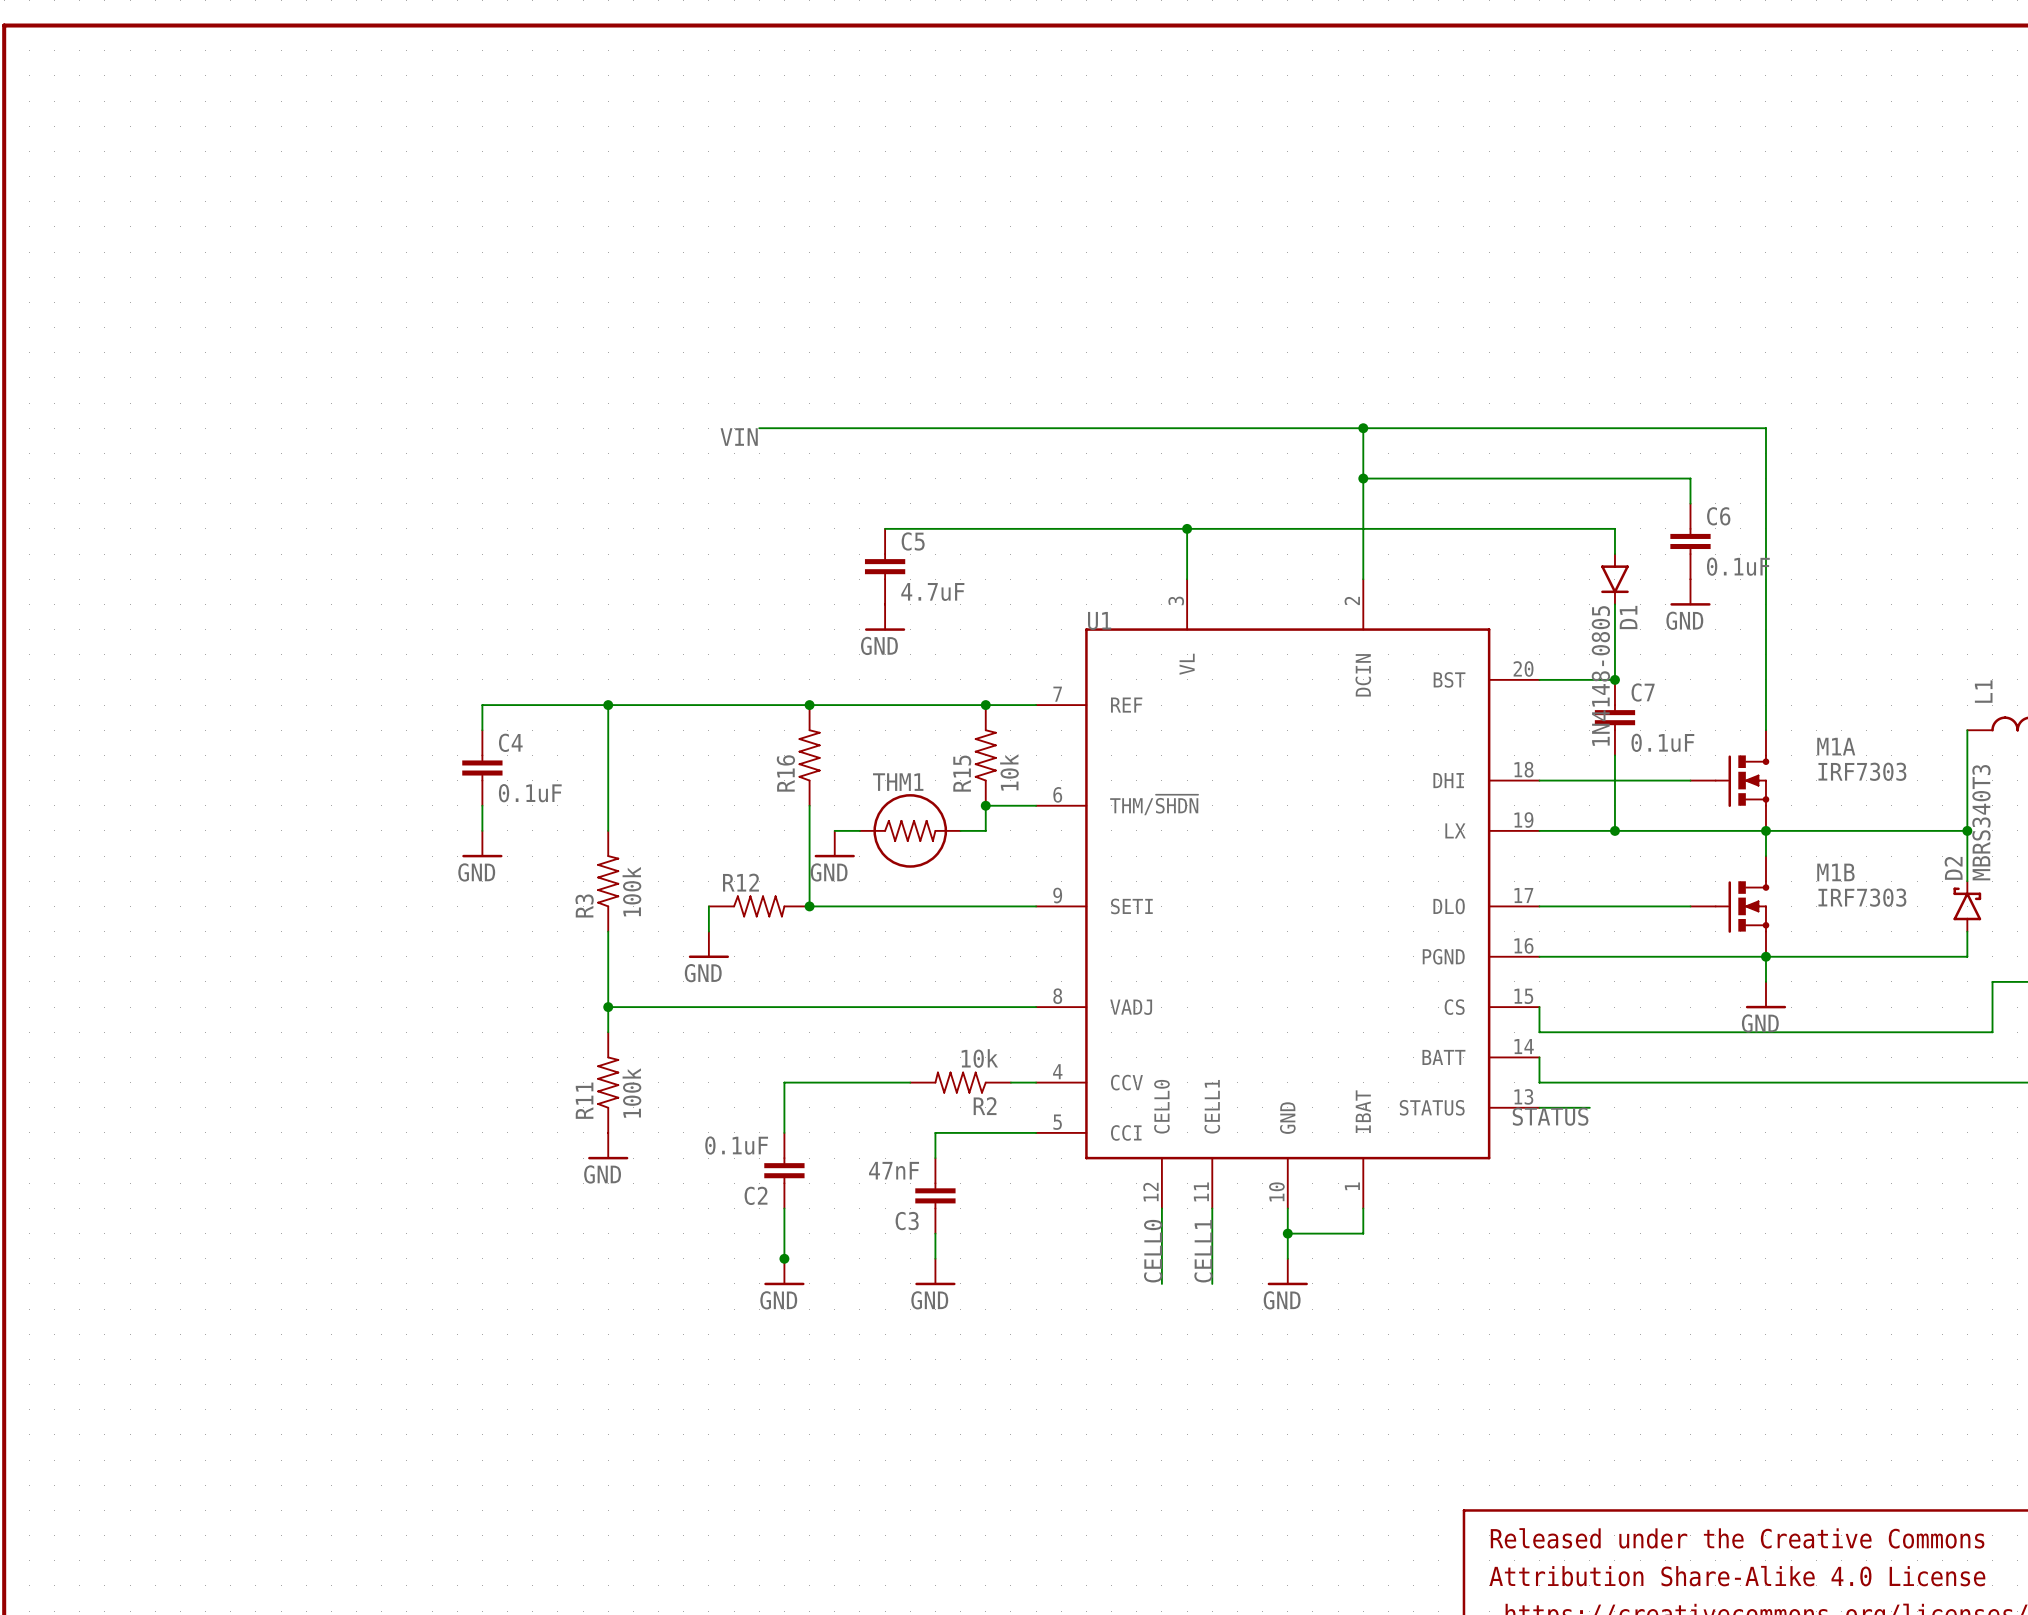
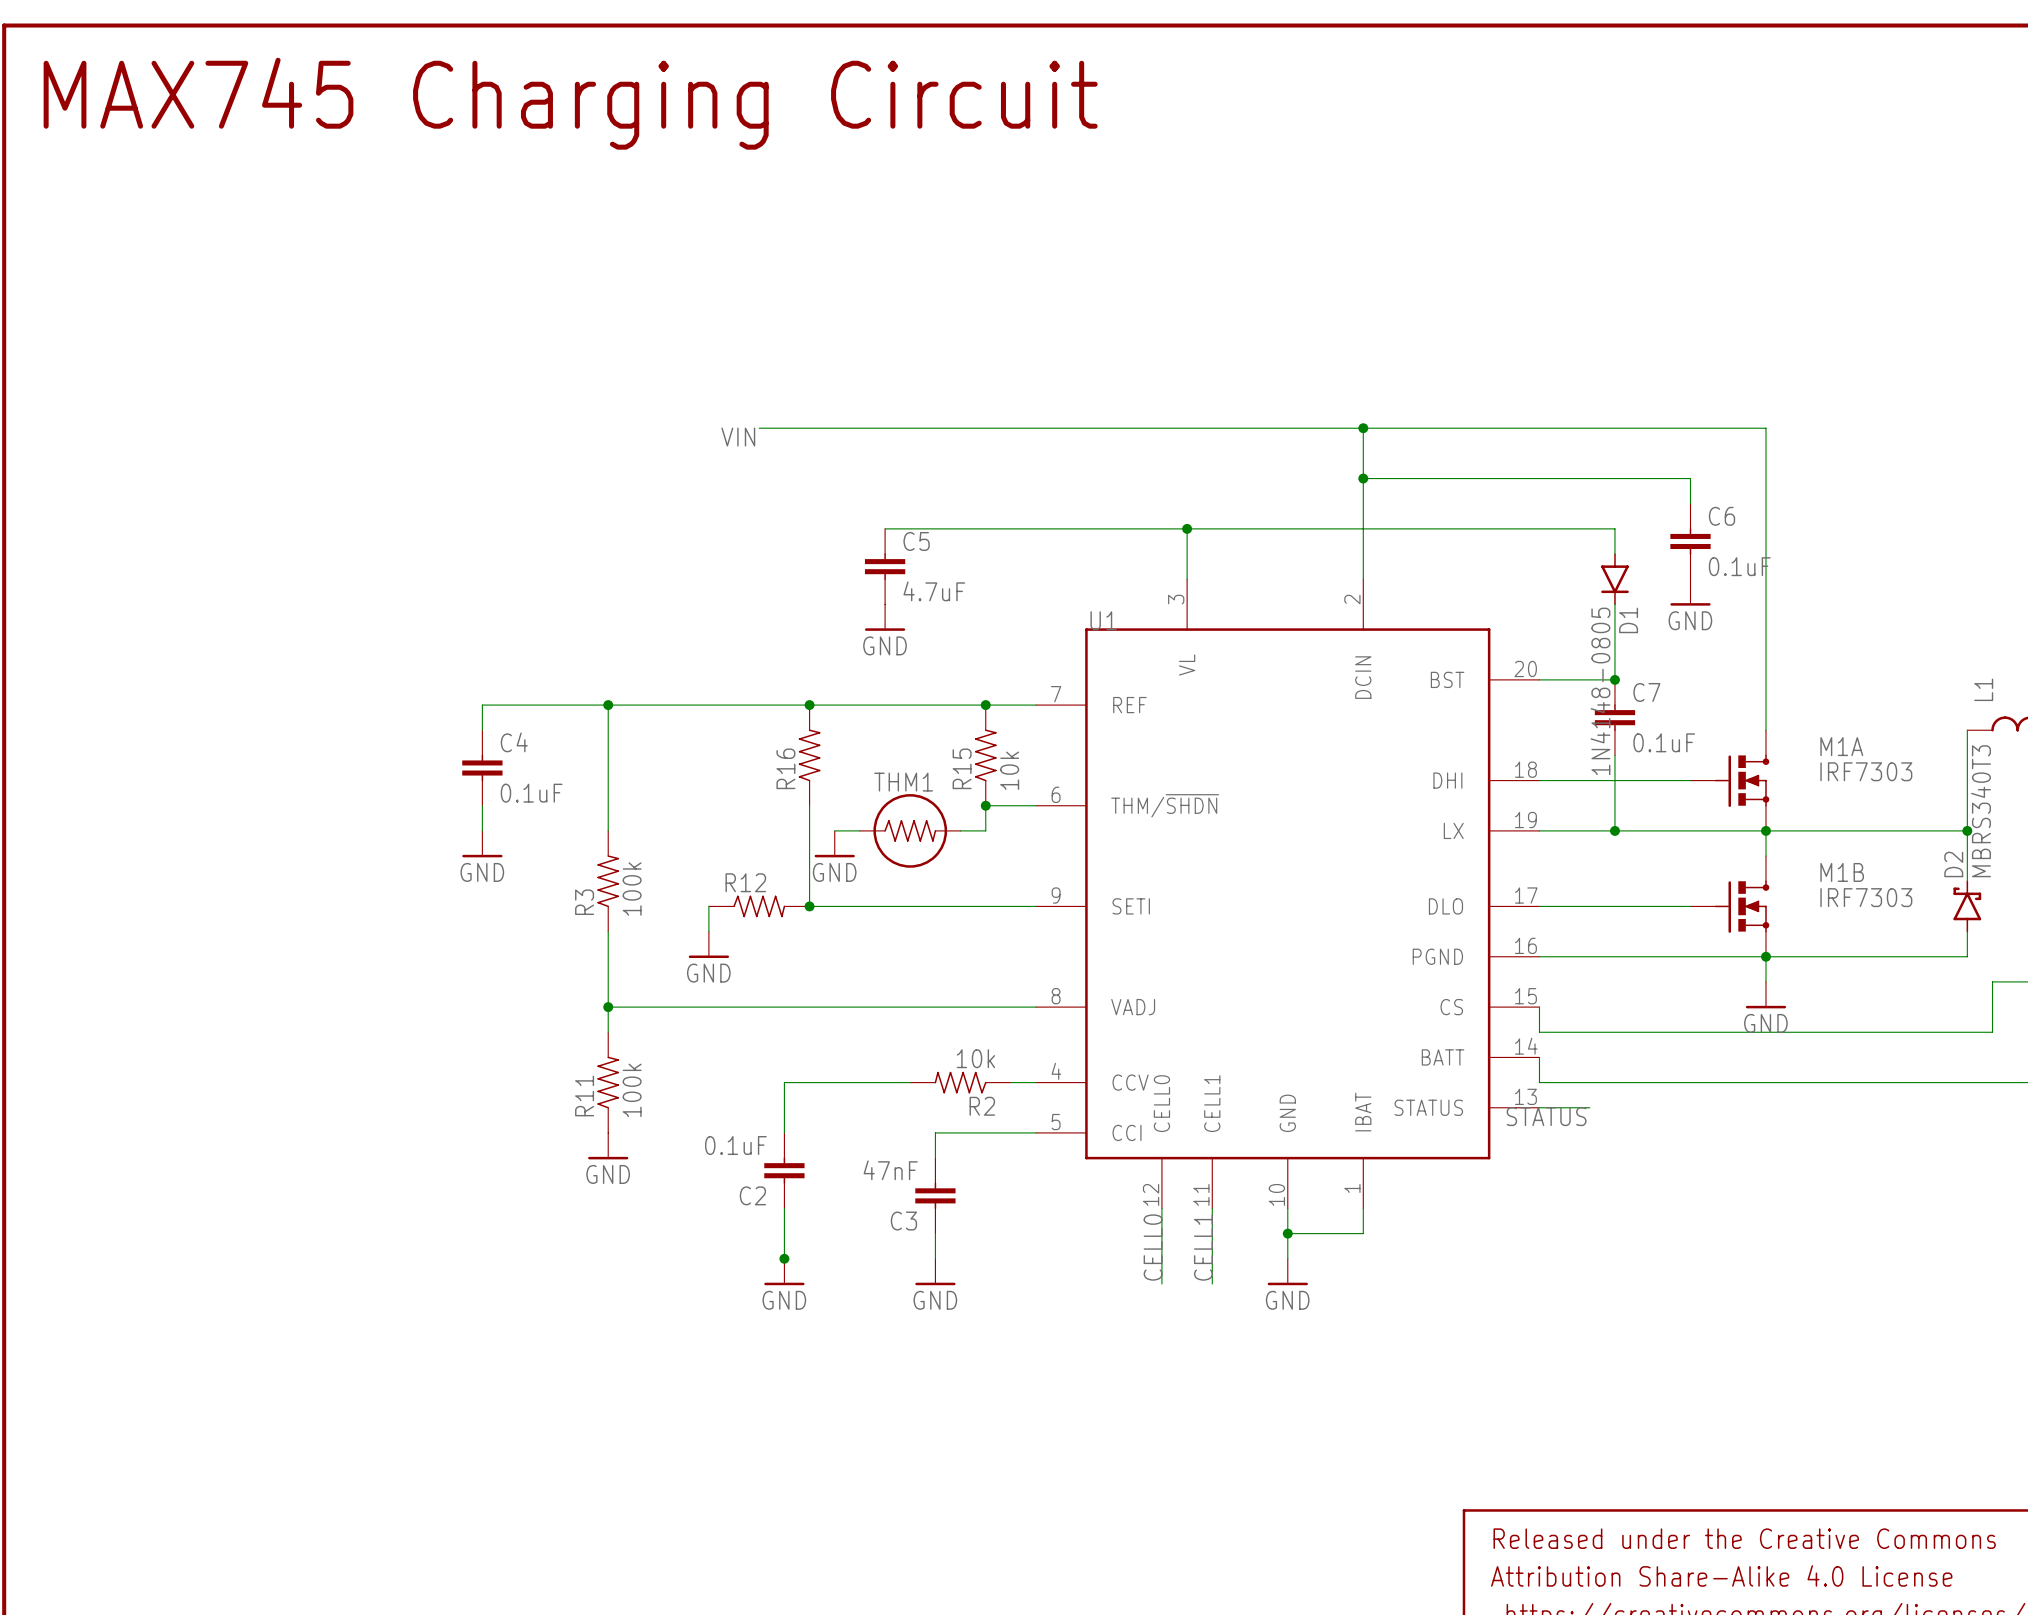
text: none -> MAX745 Charging Circuit (570, 103)

